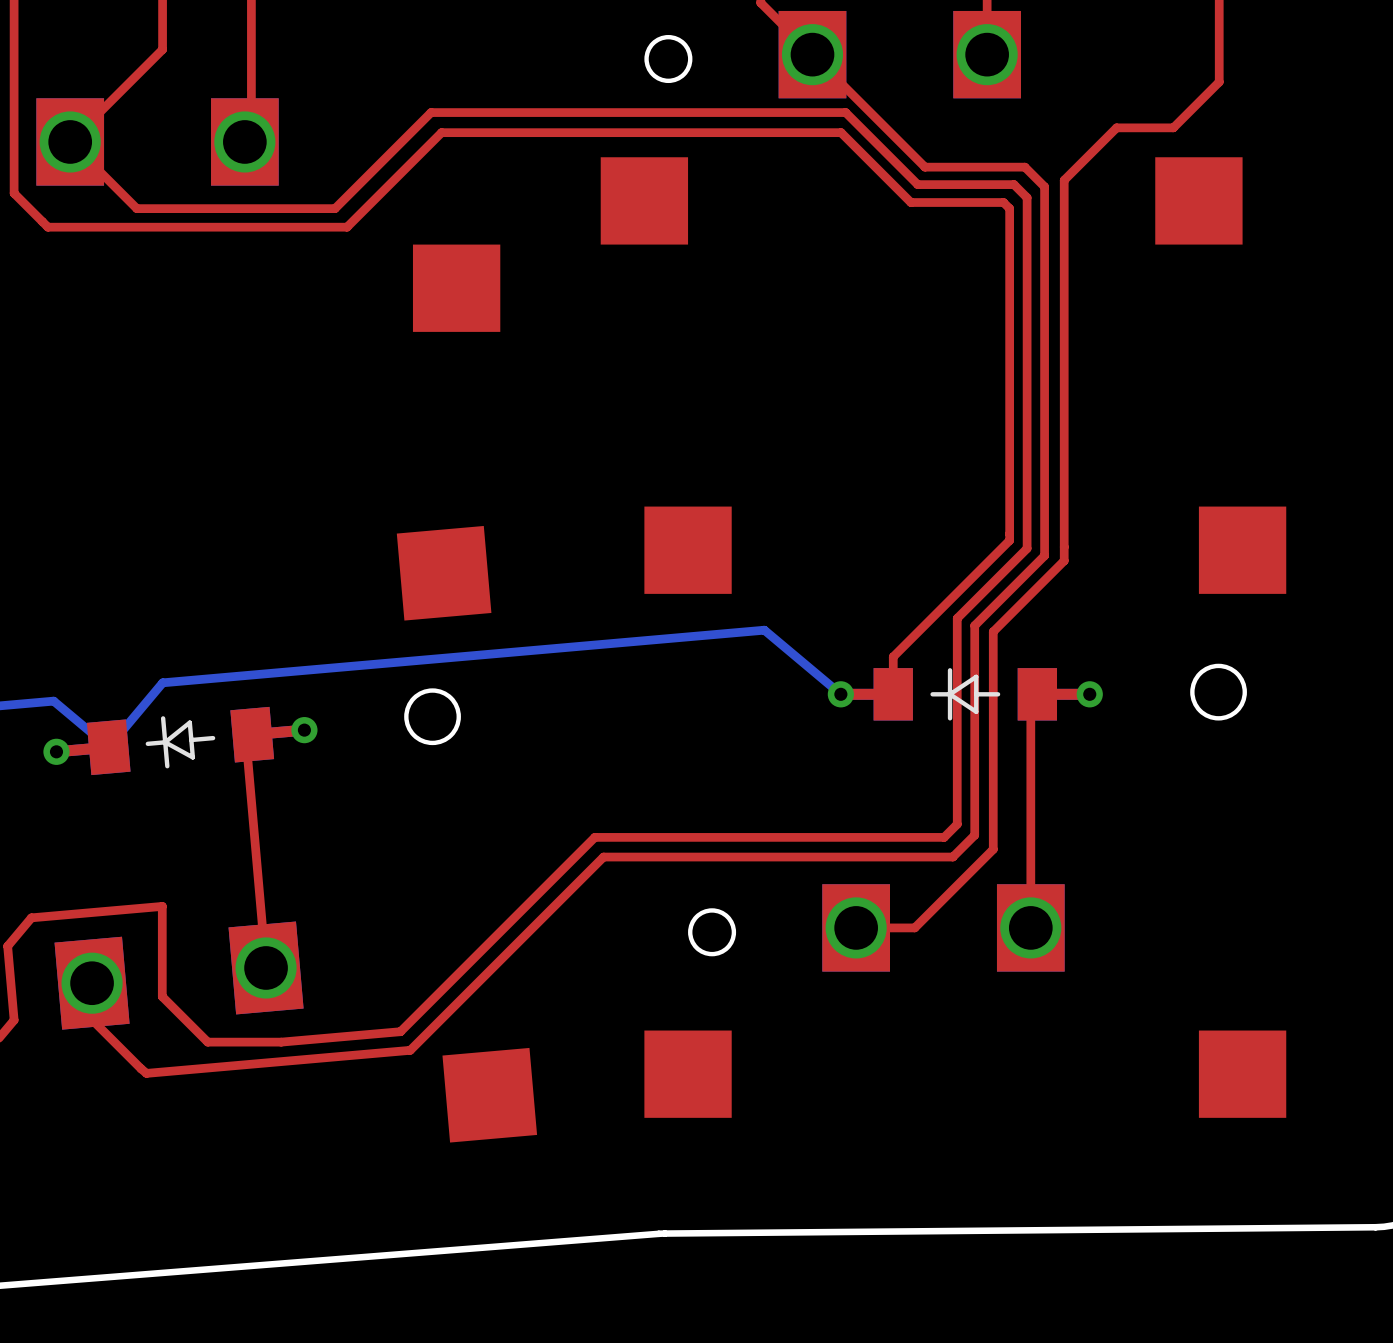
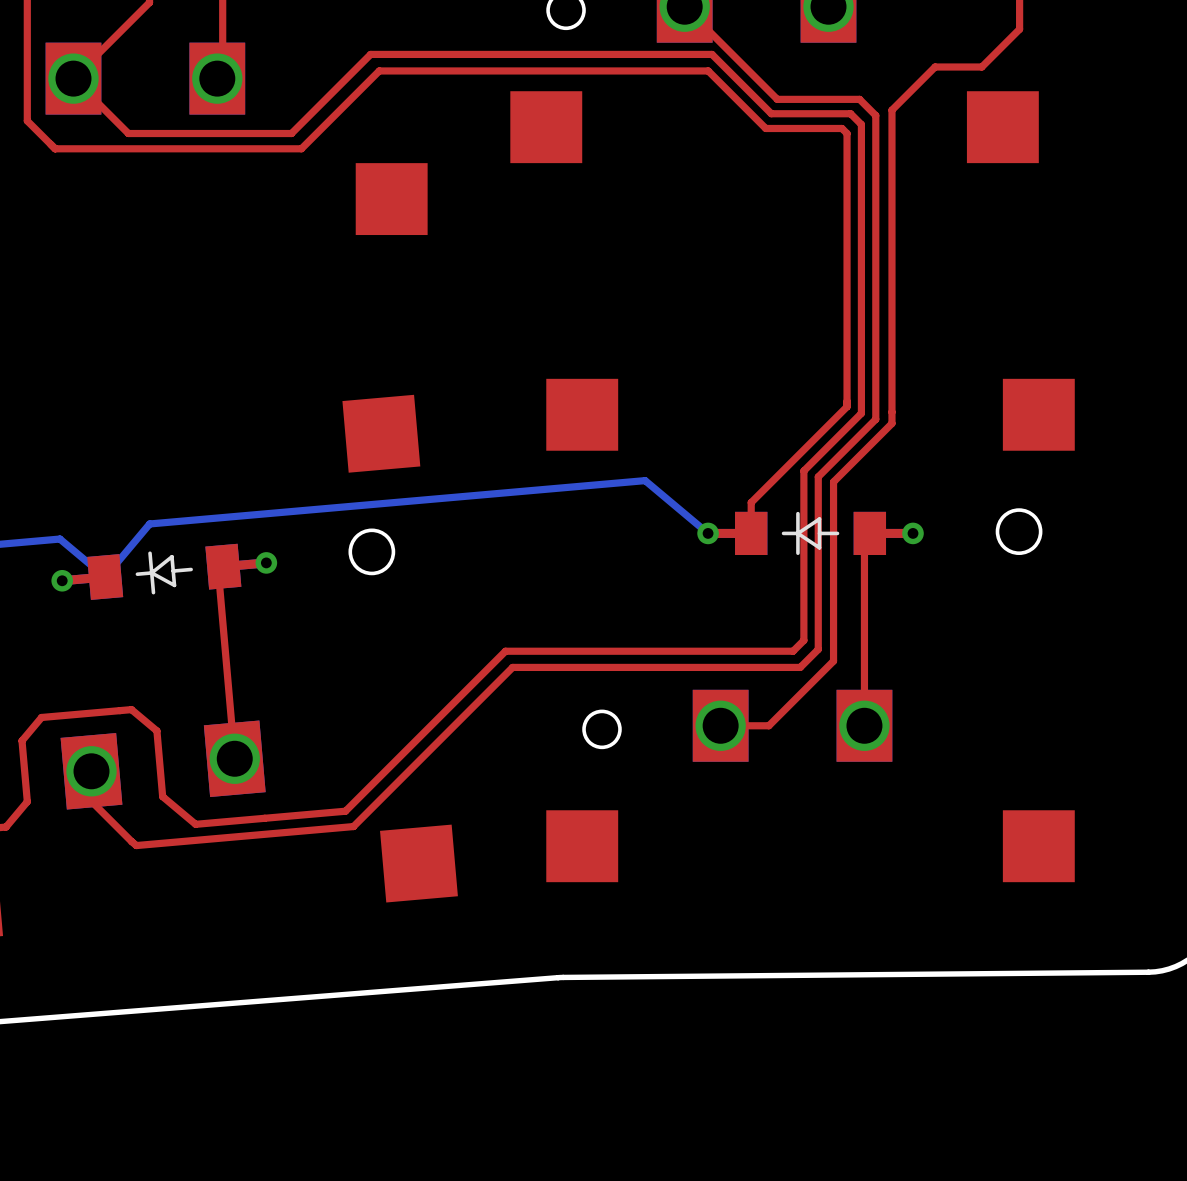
top track: (31, 917) (162, 906) (162, 996) (207, 1042) (302, 1040) -> (41, 717) (131, 709) (156, 730) (162, 796) (195, 824) (264, 818)

